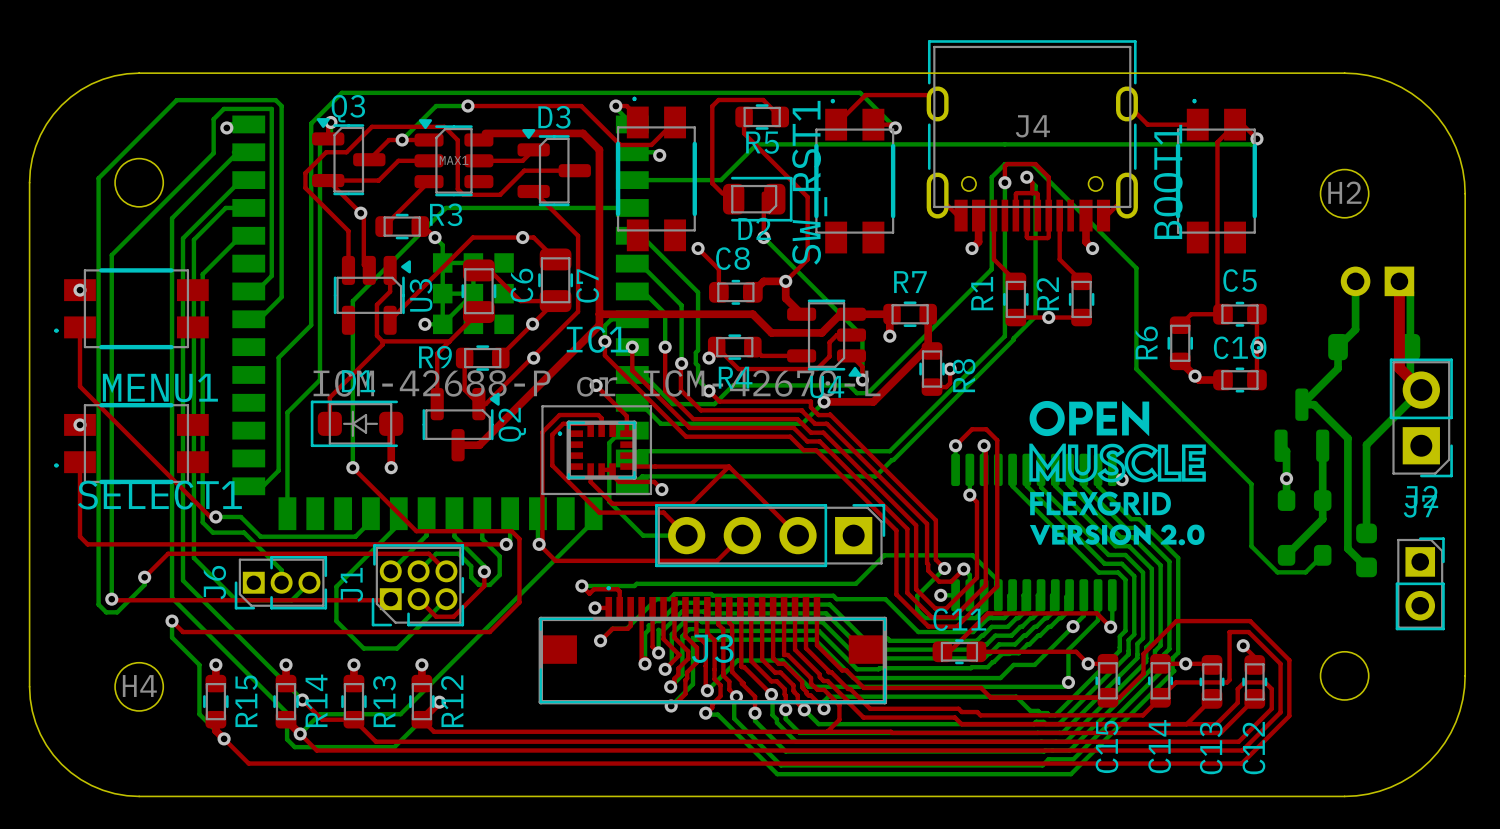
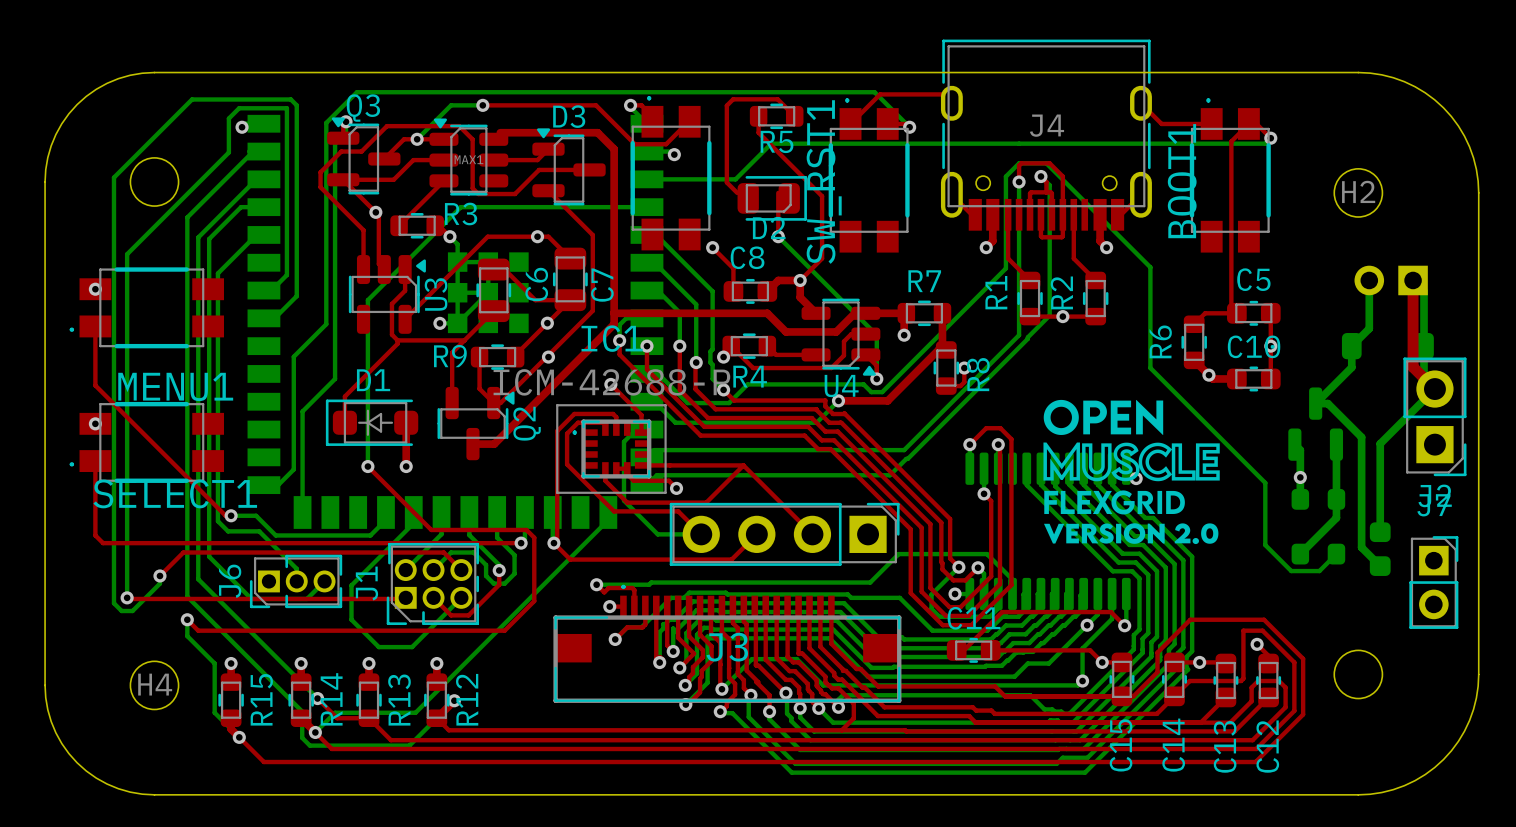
IC1 value: ICM-42688-P or ICM-42670-L (597, 383) -> ICM-42688-P (611, 382)

